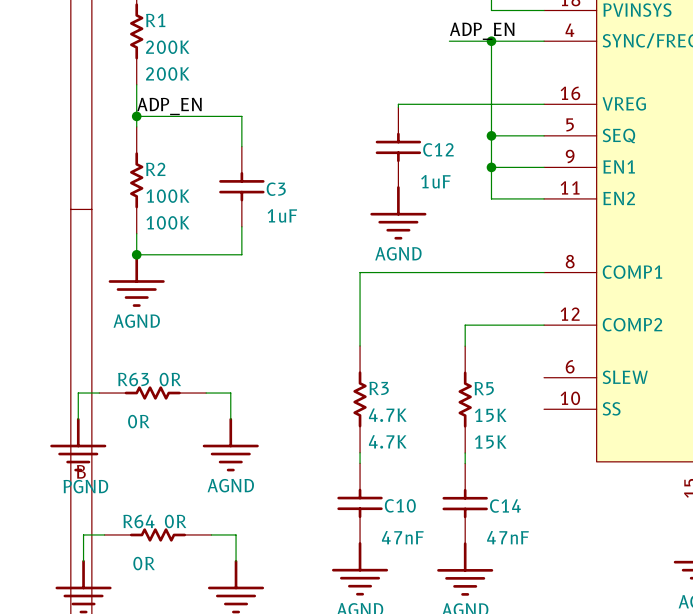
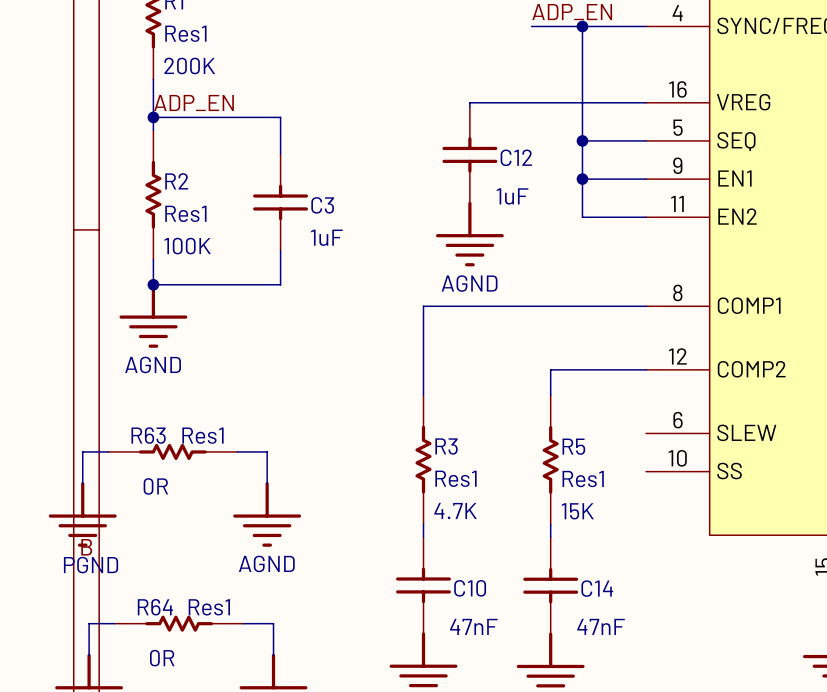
R1 value: 200K (167, 47) -> Res1 (185, 33)
R2 value: 100K (167, 196) -> Res1 (185, 213)
R63 value: 0R (170, 379) -> Res1 (202, 435)
R3 value: 4.7K (387, 415) -> Res1 (455, 478)
R5 value: 15K (490, 415) -> Res1 (583, 479)
R64 value: 0R (175, 521) -> Res1 (209, 607)

